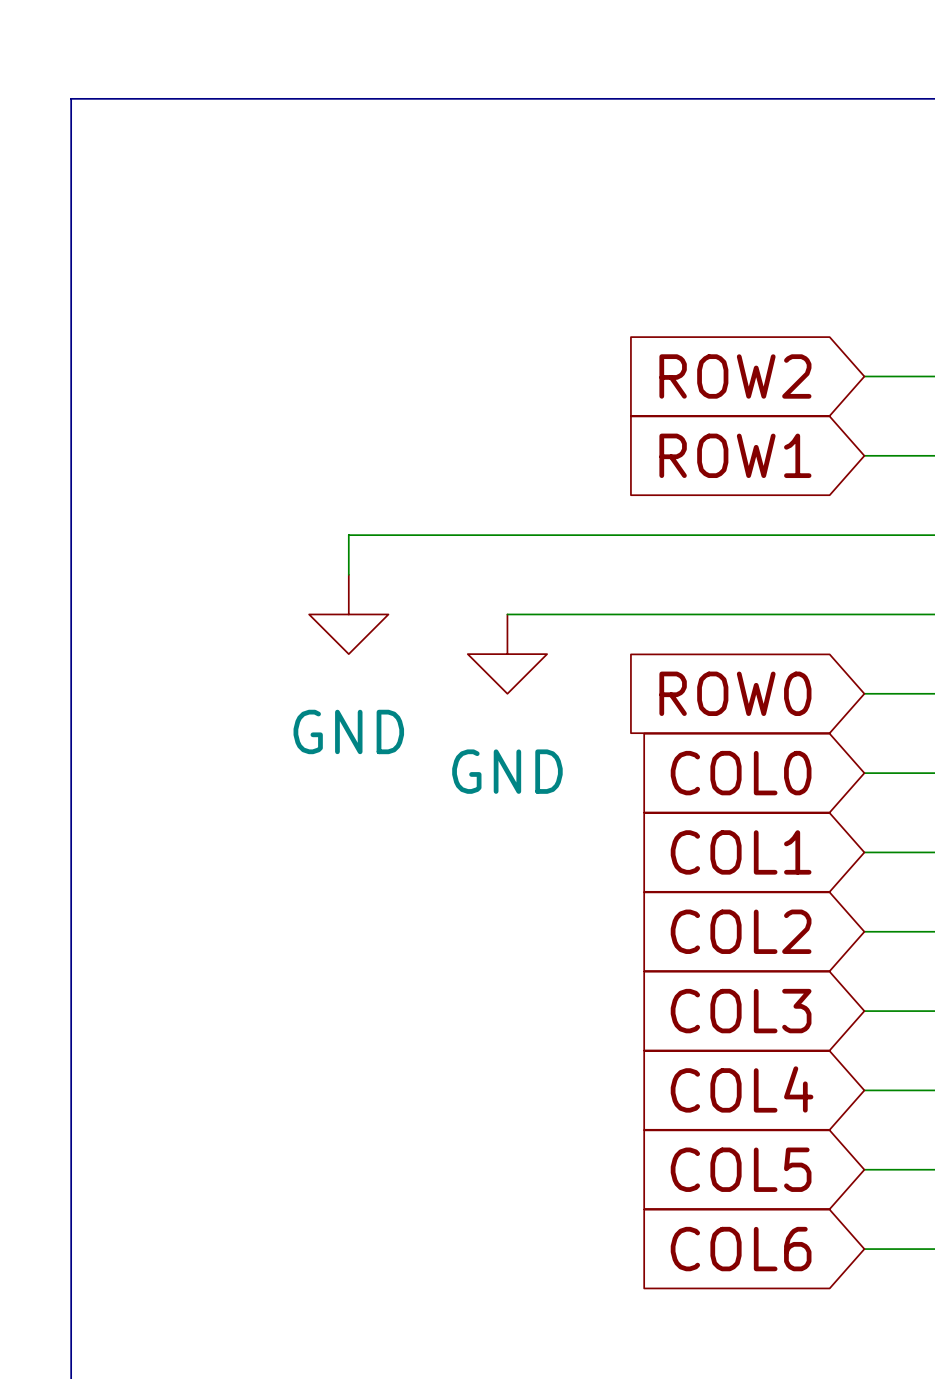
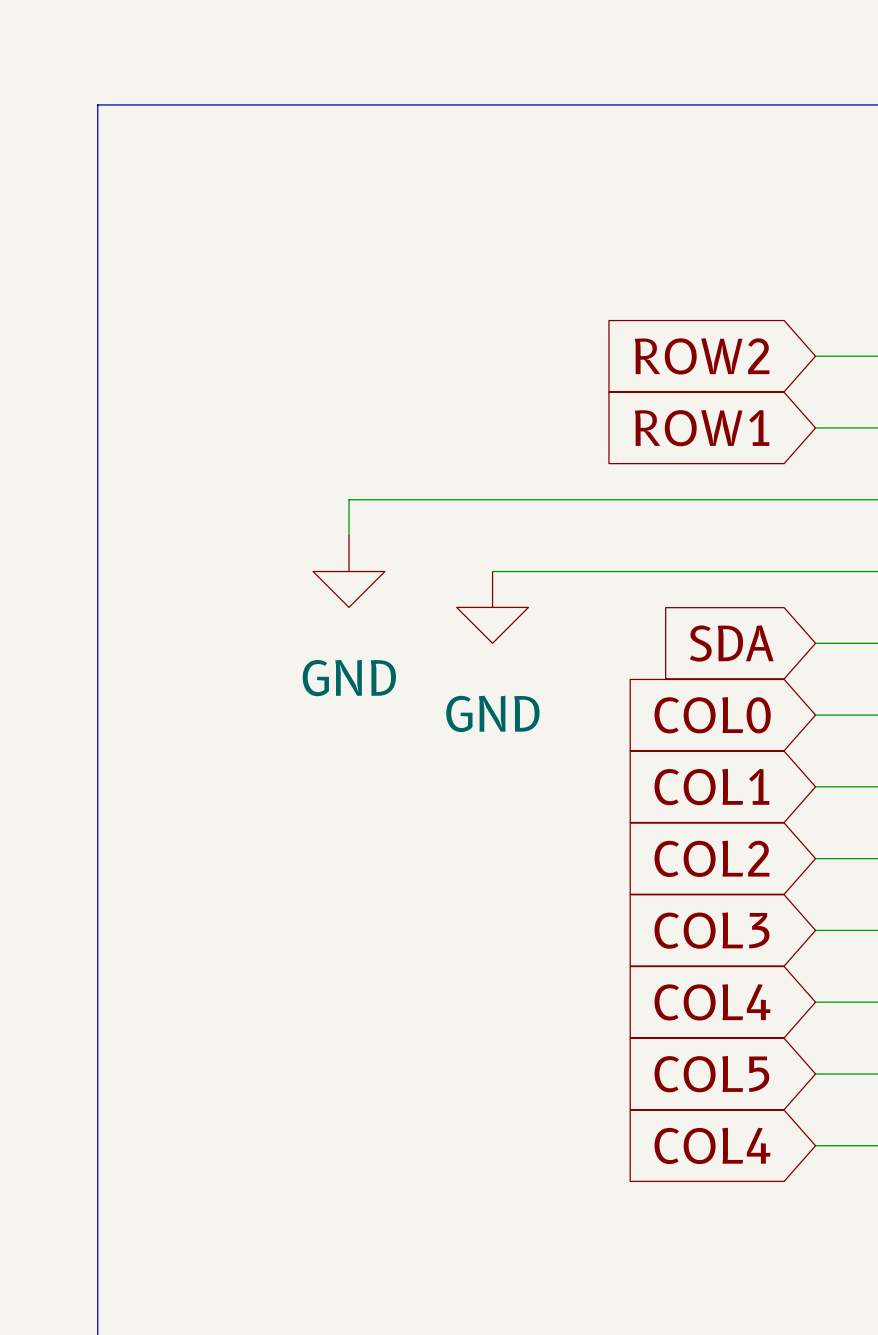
global label: ROW0 (735, 693) -> SDA (731, 643)
global label: COL6 (741, 1249) -> COL4 (712, 1145)

